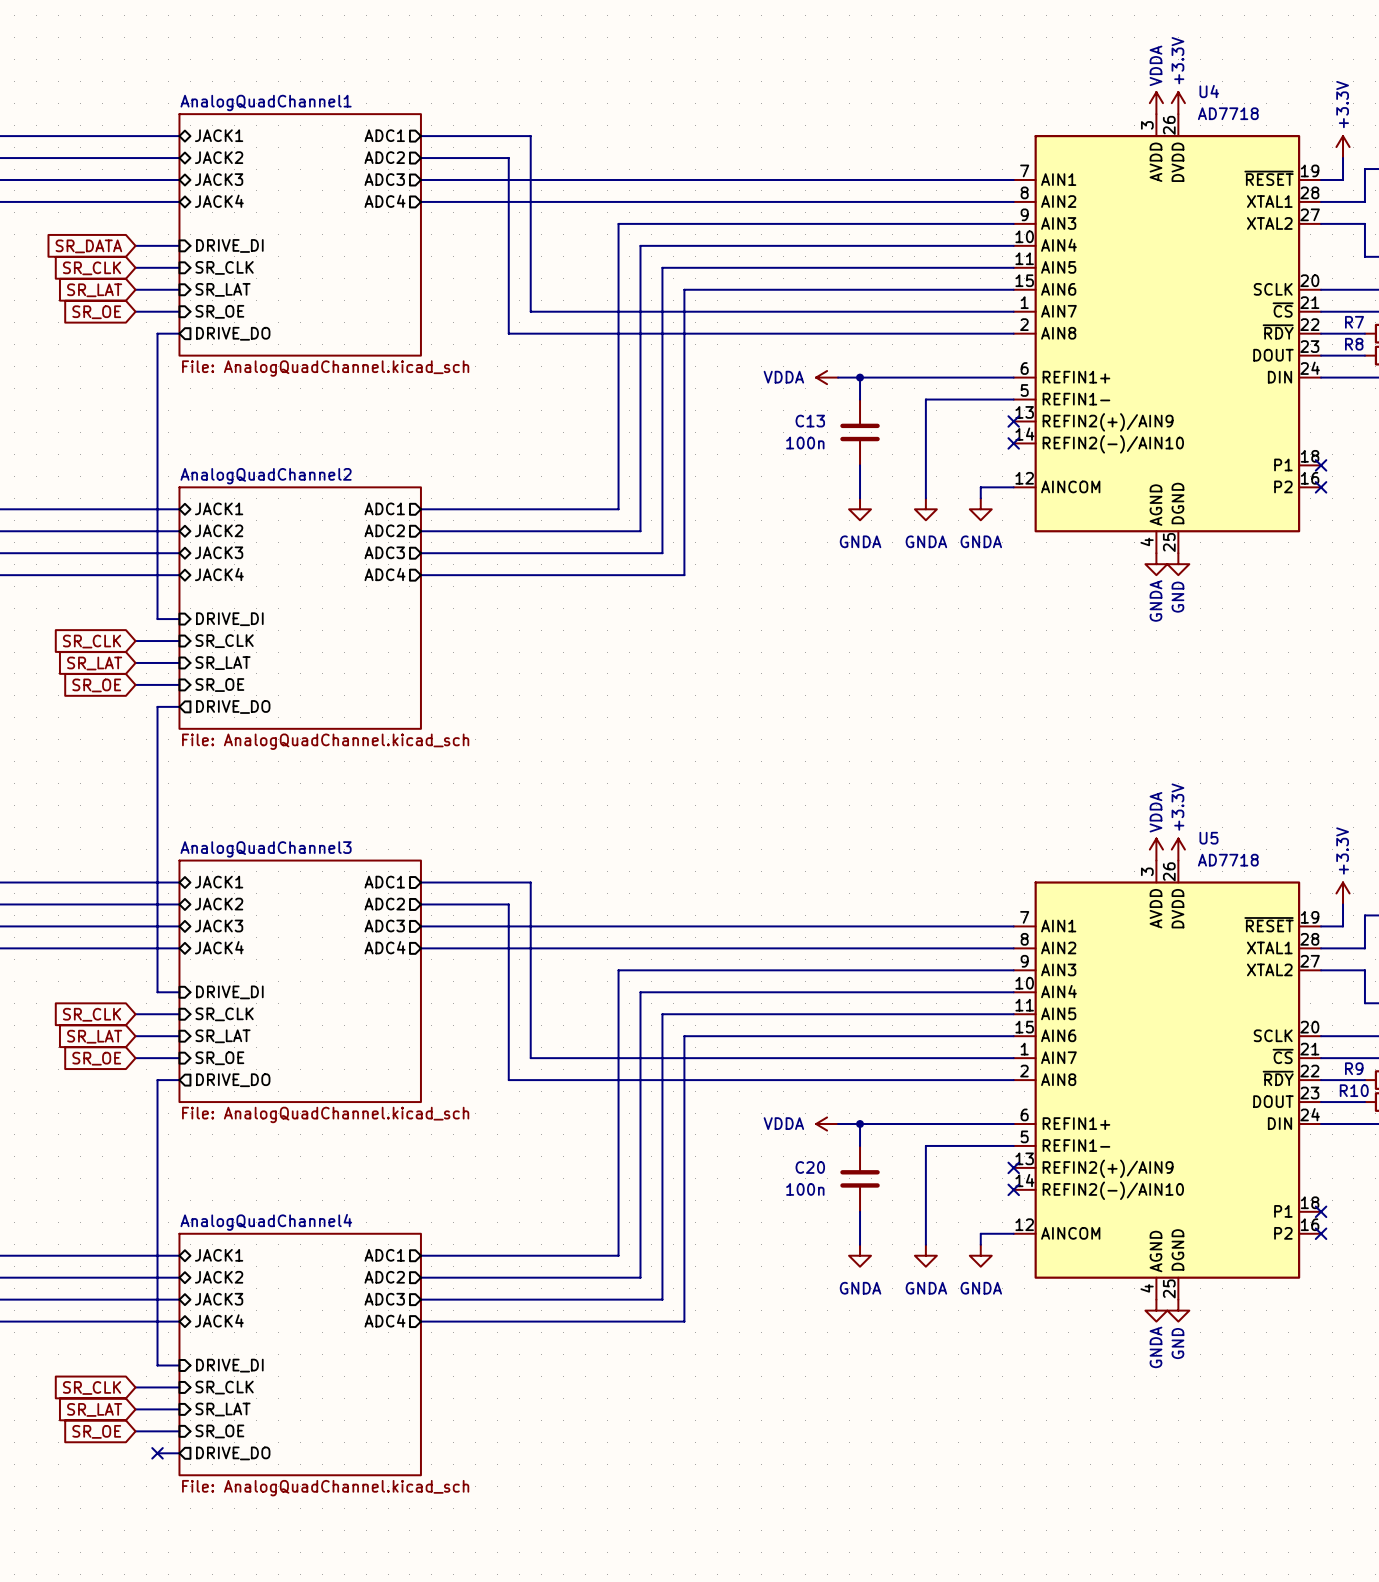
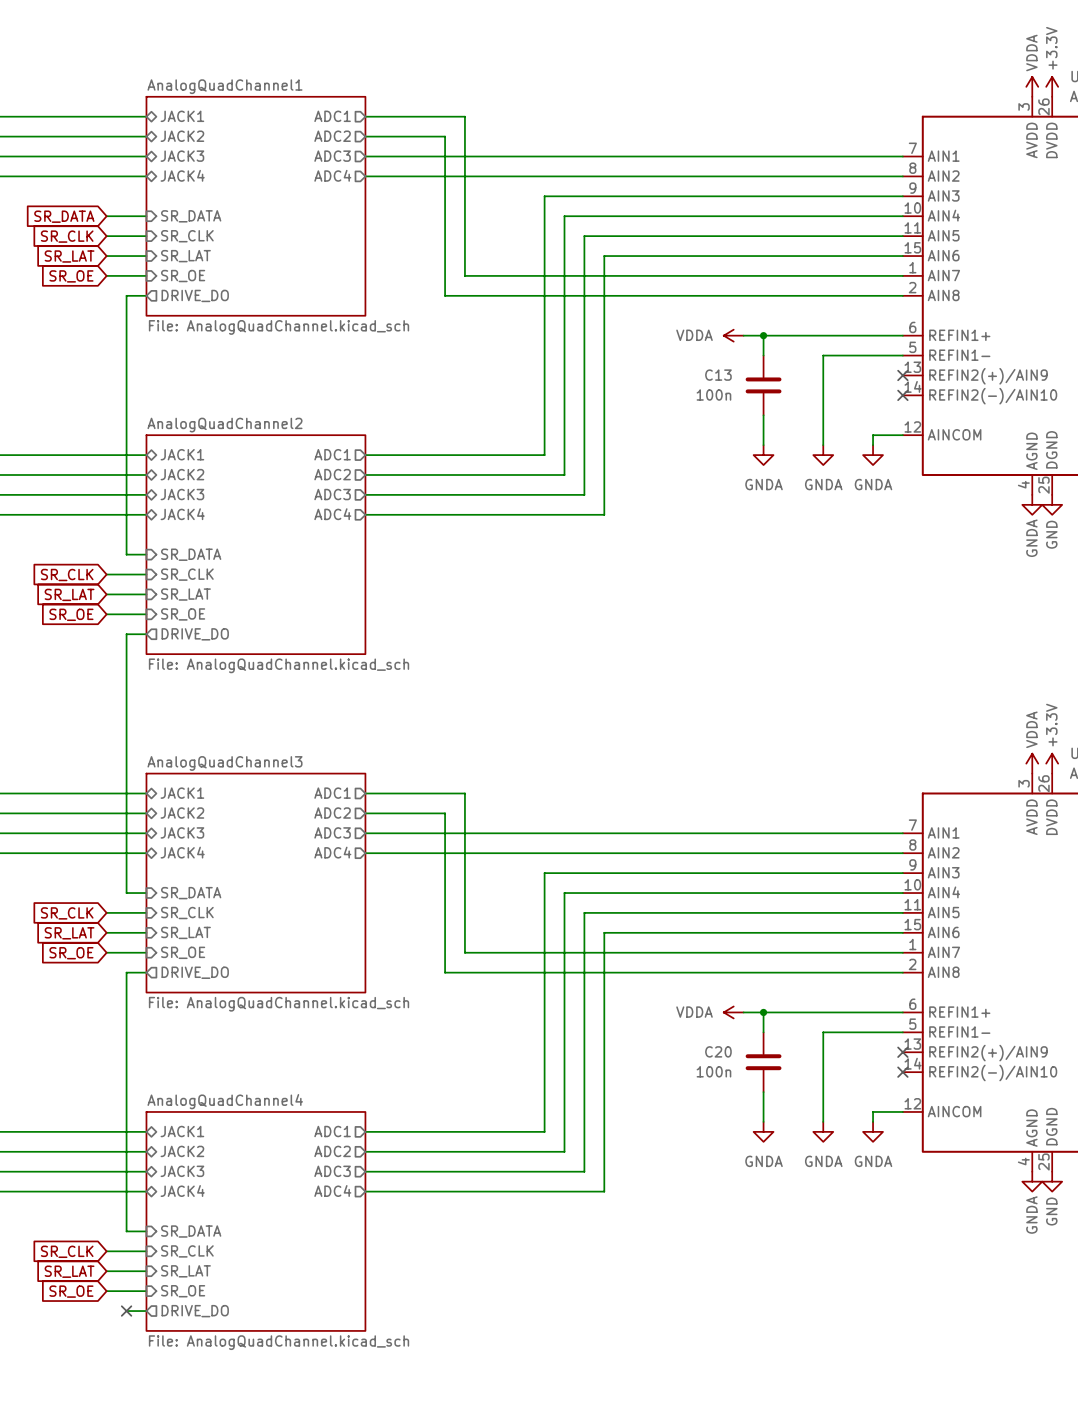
sheet pin: DRIVE_DI (229, 245) -> SR_DATA (191, 216)
sheet pin: DRIVE_DI (229, 619) -> SR_DATA (191, 554)
sheet pin: DRIVE_DI (229, 992) -> SR_DATA (191, 893)
sheet pin: DRIVE_DI (229, 1365) -> SR_DATA (191, 1231)

